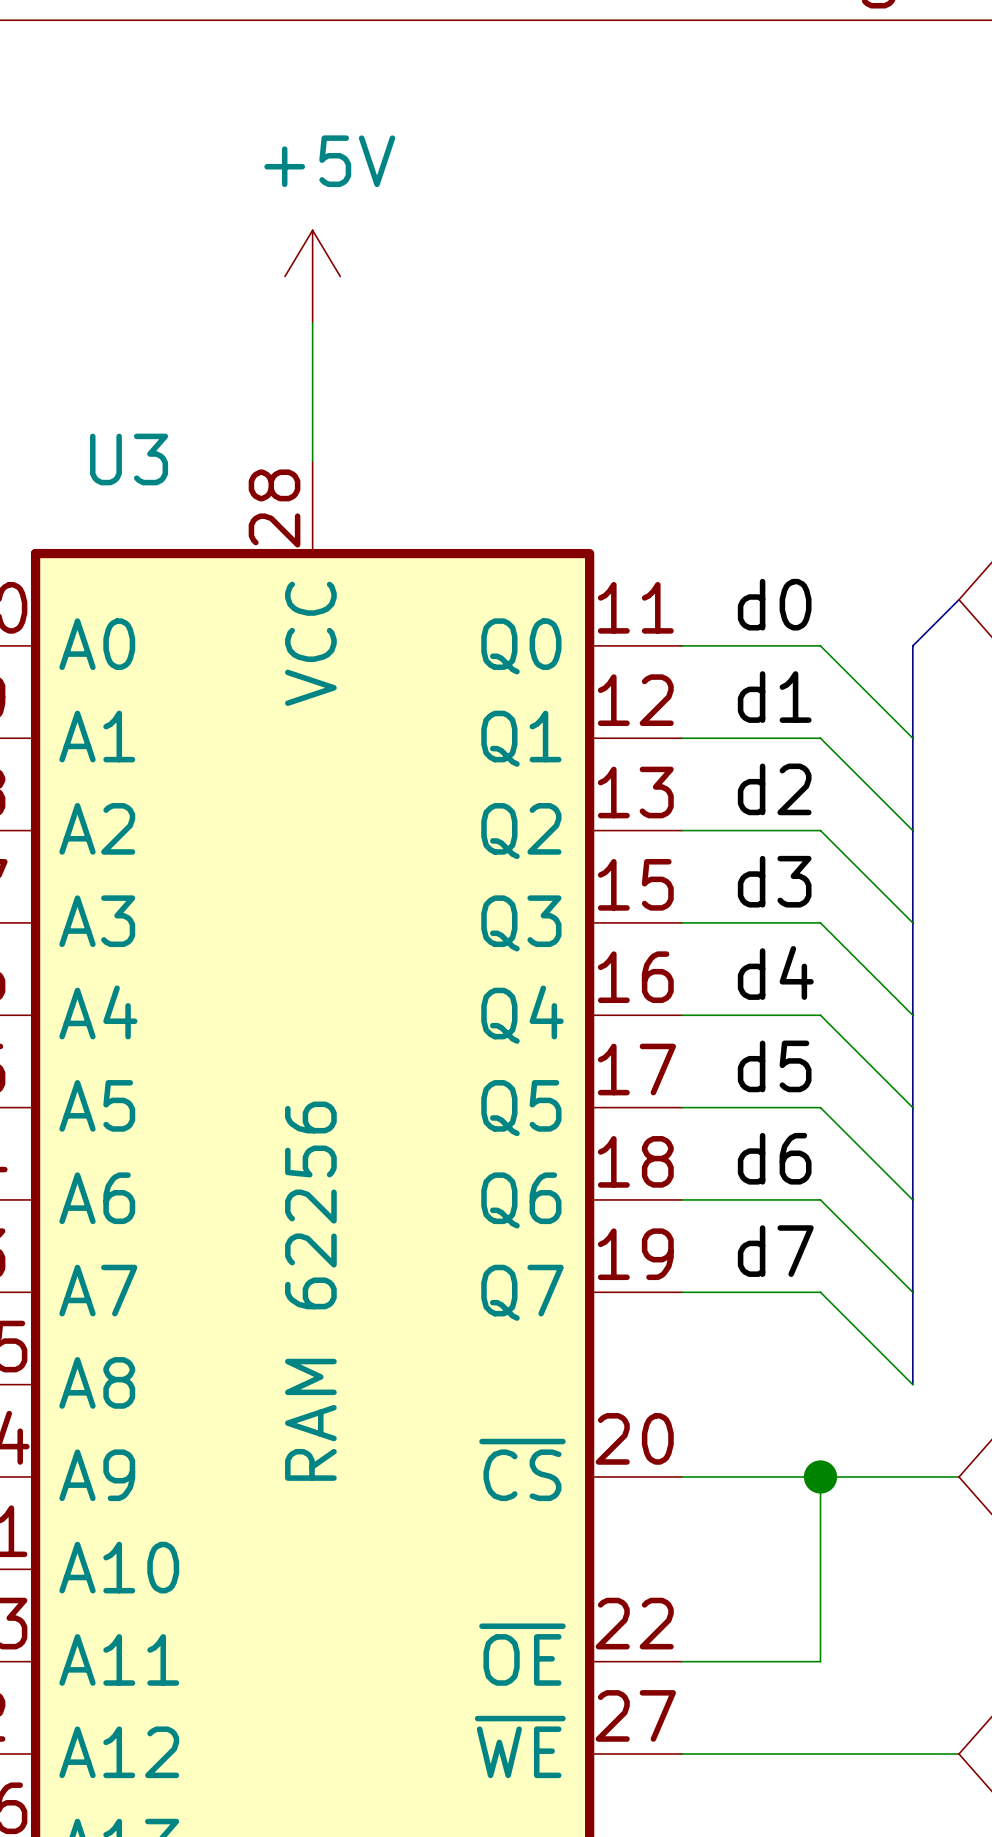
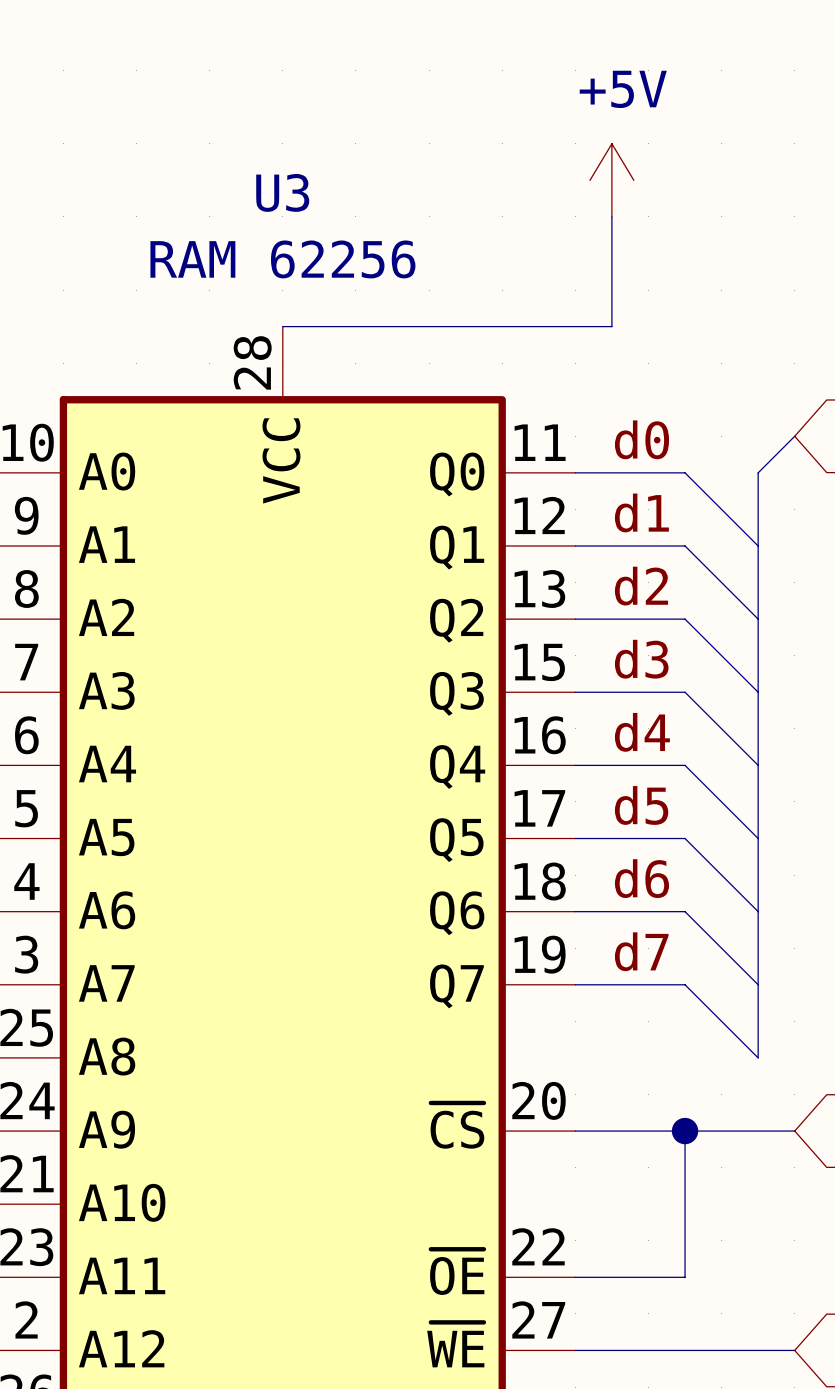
power symbol position: +5V (312, 276) -> +5V (611, 180)
wire: (312, 322) (312, 461) -> (611, 216) (611, 326) (282, 326)
U3 name position: U3 (129, 459) -> U3 (282, 192)
U3 value rotation: 0° (310, 1291) -> 90° clockwise (282, 259)
U3 value position: RAM 62256 (310, 1291) -> RAM 62256 (282, 259)

